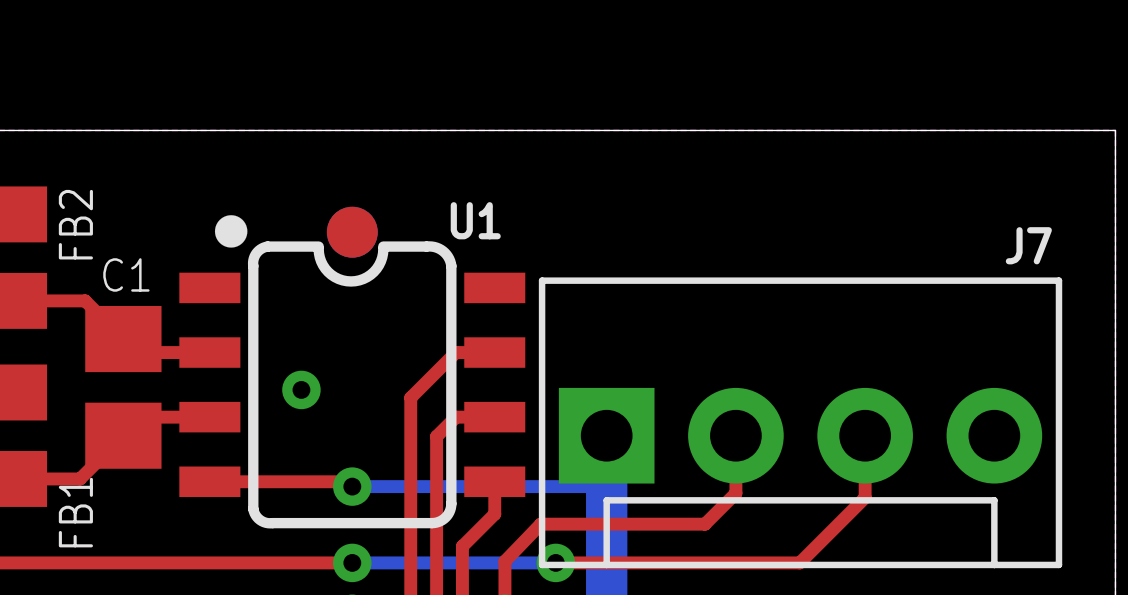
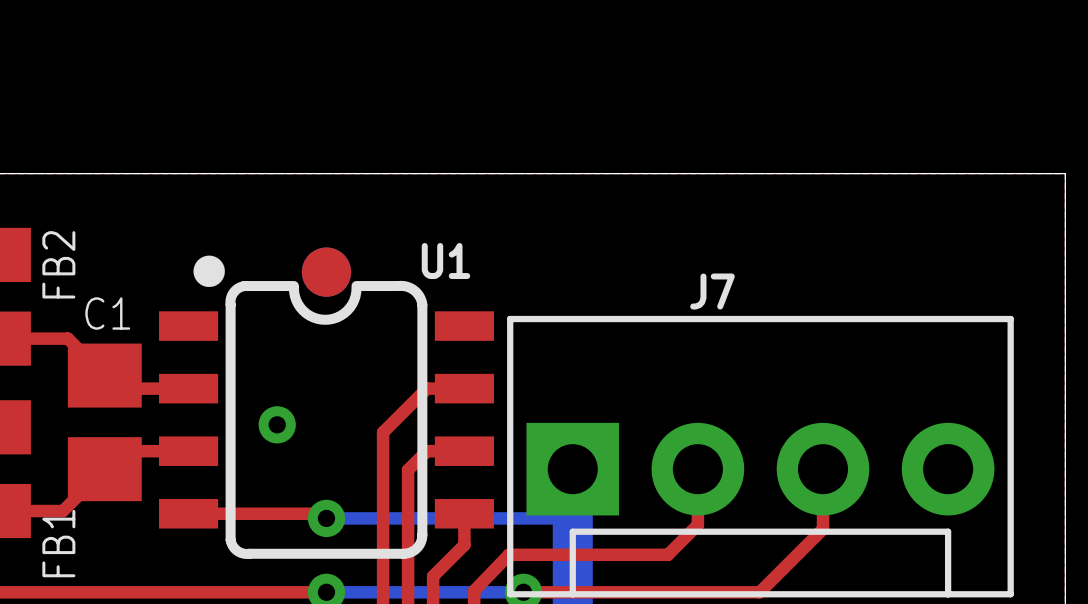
J7 name position: J7 (1028, 245) -> J7 (712, 291)

